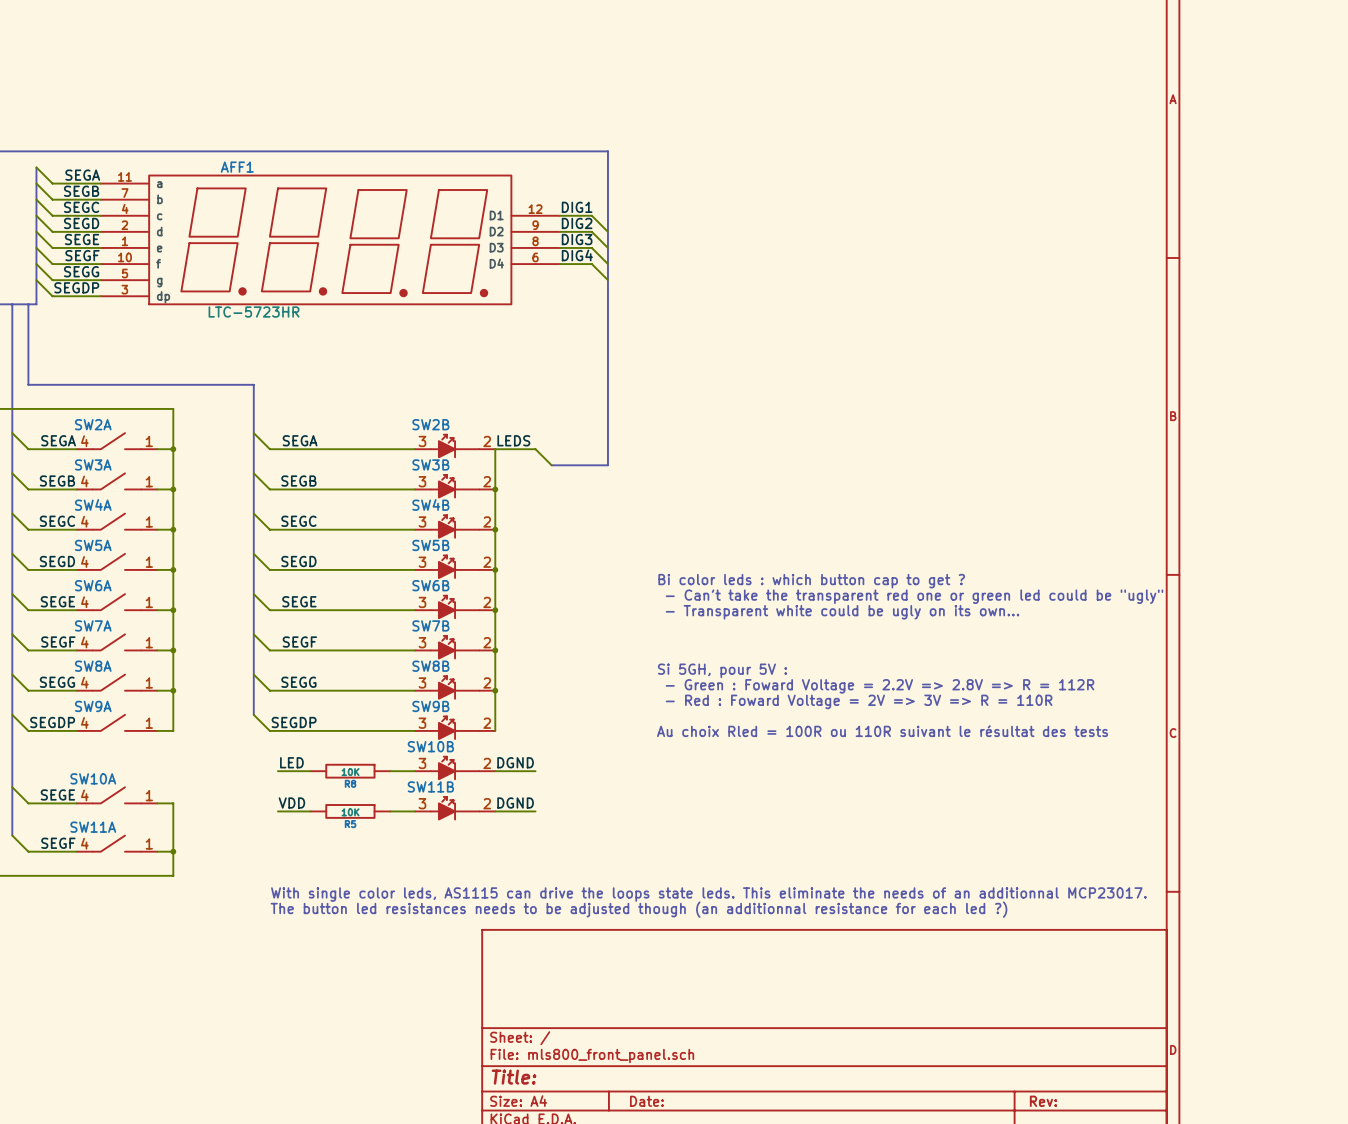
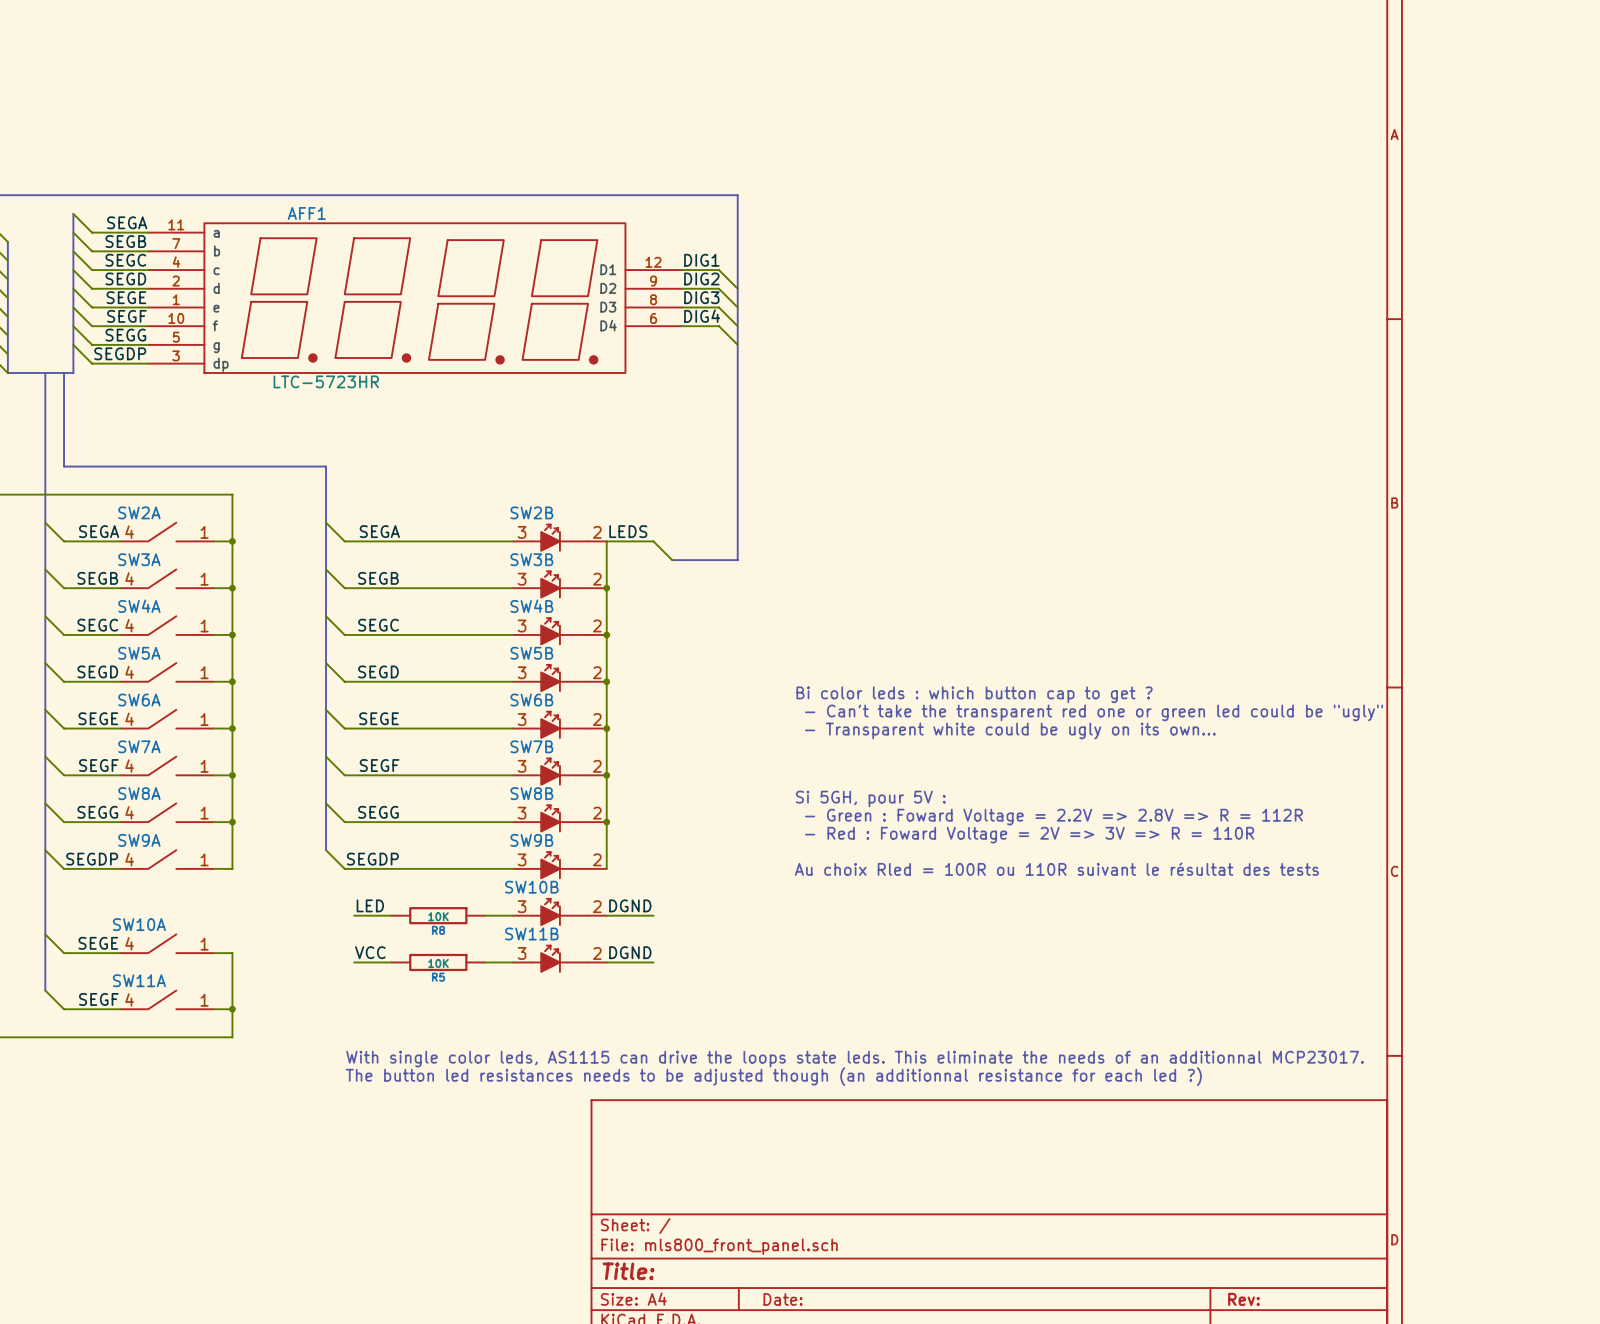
label: VDD (291, 803) -> VCC (370, 952)

